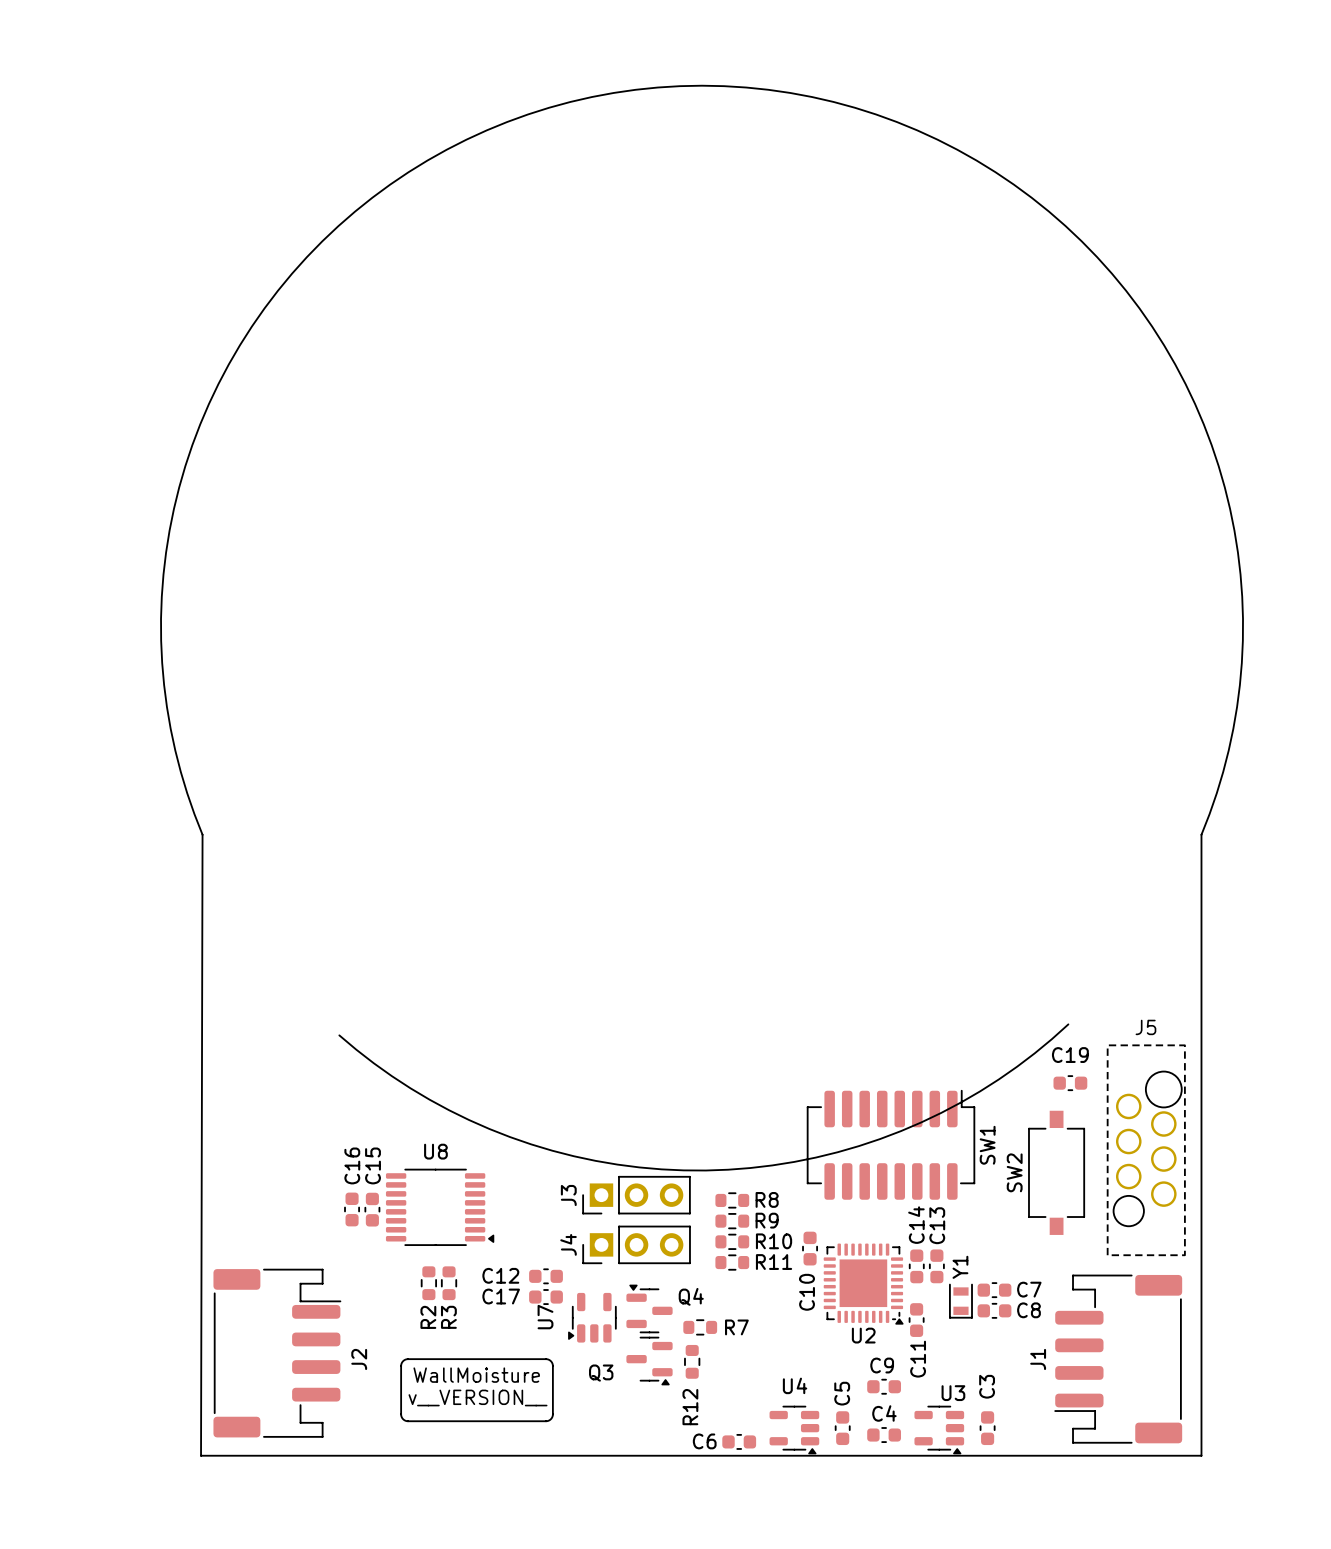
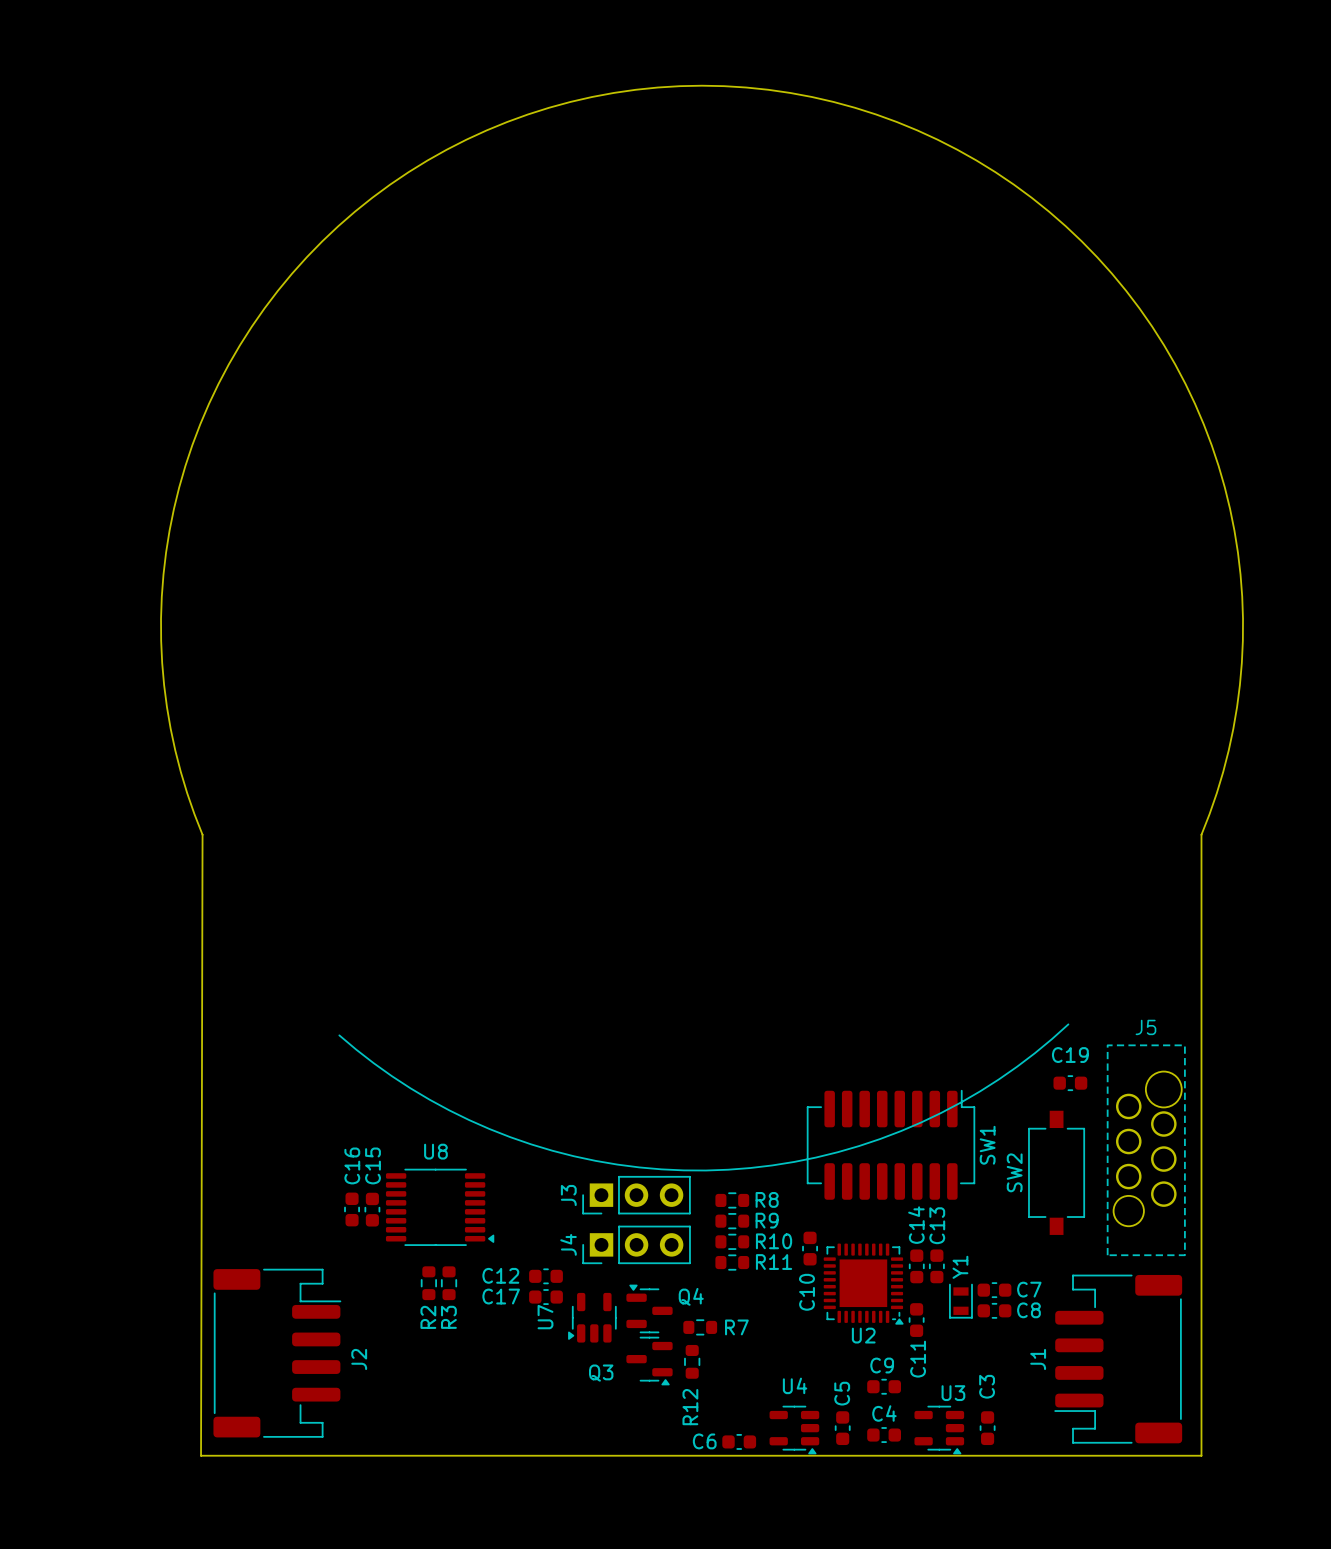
line: (408, 1359) (548, 1359) (552, 1366) (552, 1416) (546, 1421) (405, 1420) (401, 1415) (401, 1366) (403, 1361) (408, 1359) -> none
text: WallMoisture (476, 1375) -> none
text: v__VERSION__ (478, 1397) -> none

